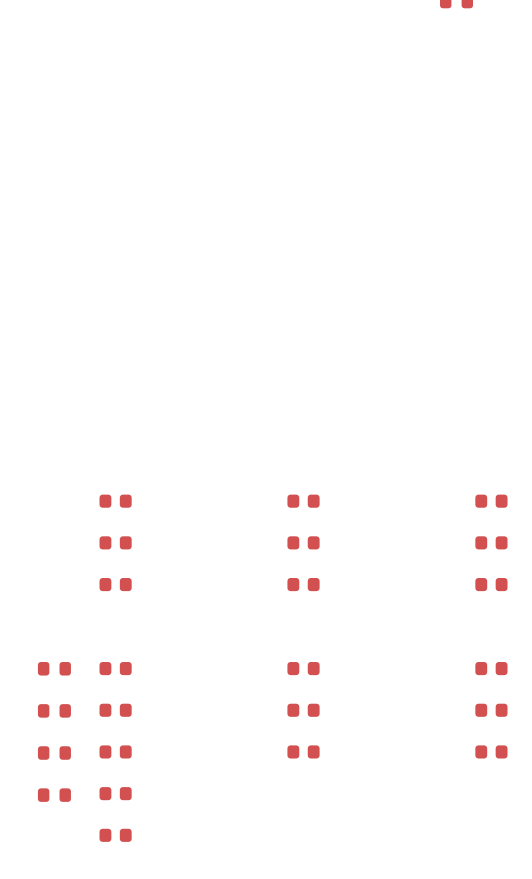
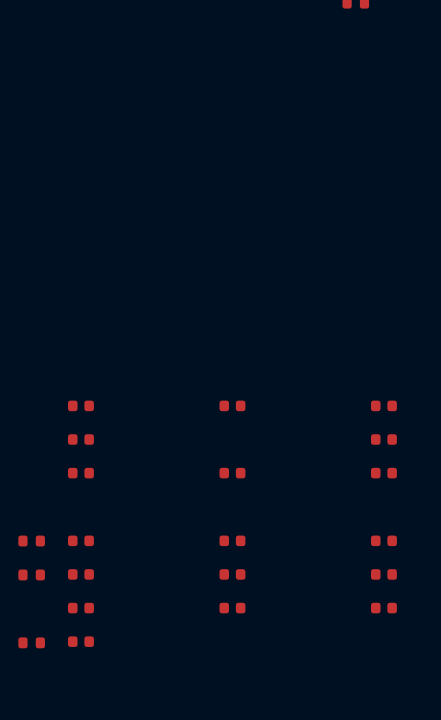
part: (303, 542) -> none
part: (54, 753) -> none
part: (115, 835) -> none

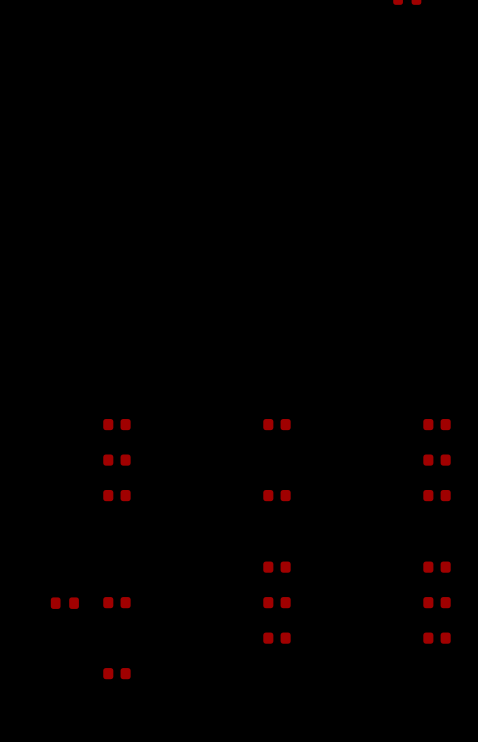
part: (80, 540) -> none
part: (31, 541) -> none
part: (80, 608) -> none
part: (31, 642) -> none

